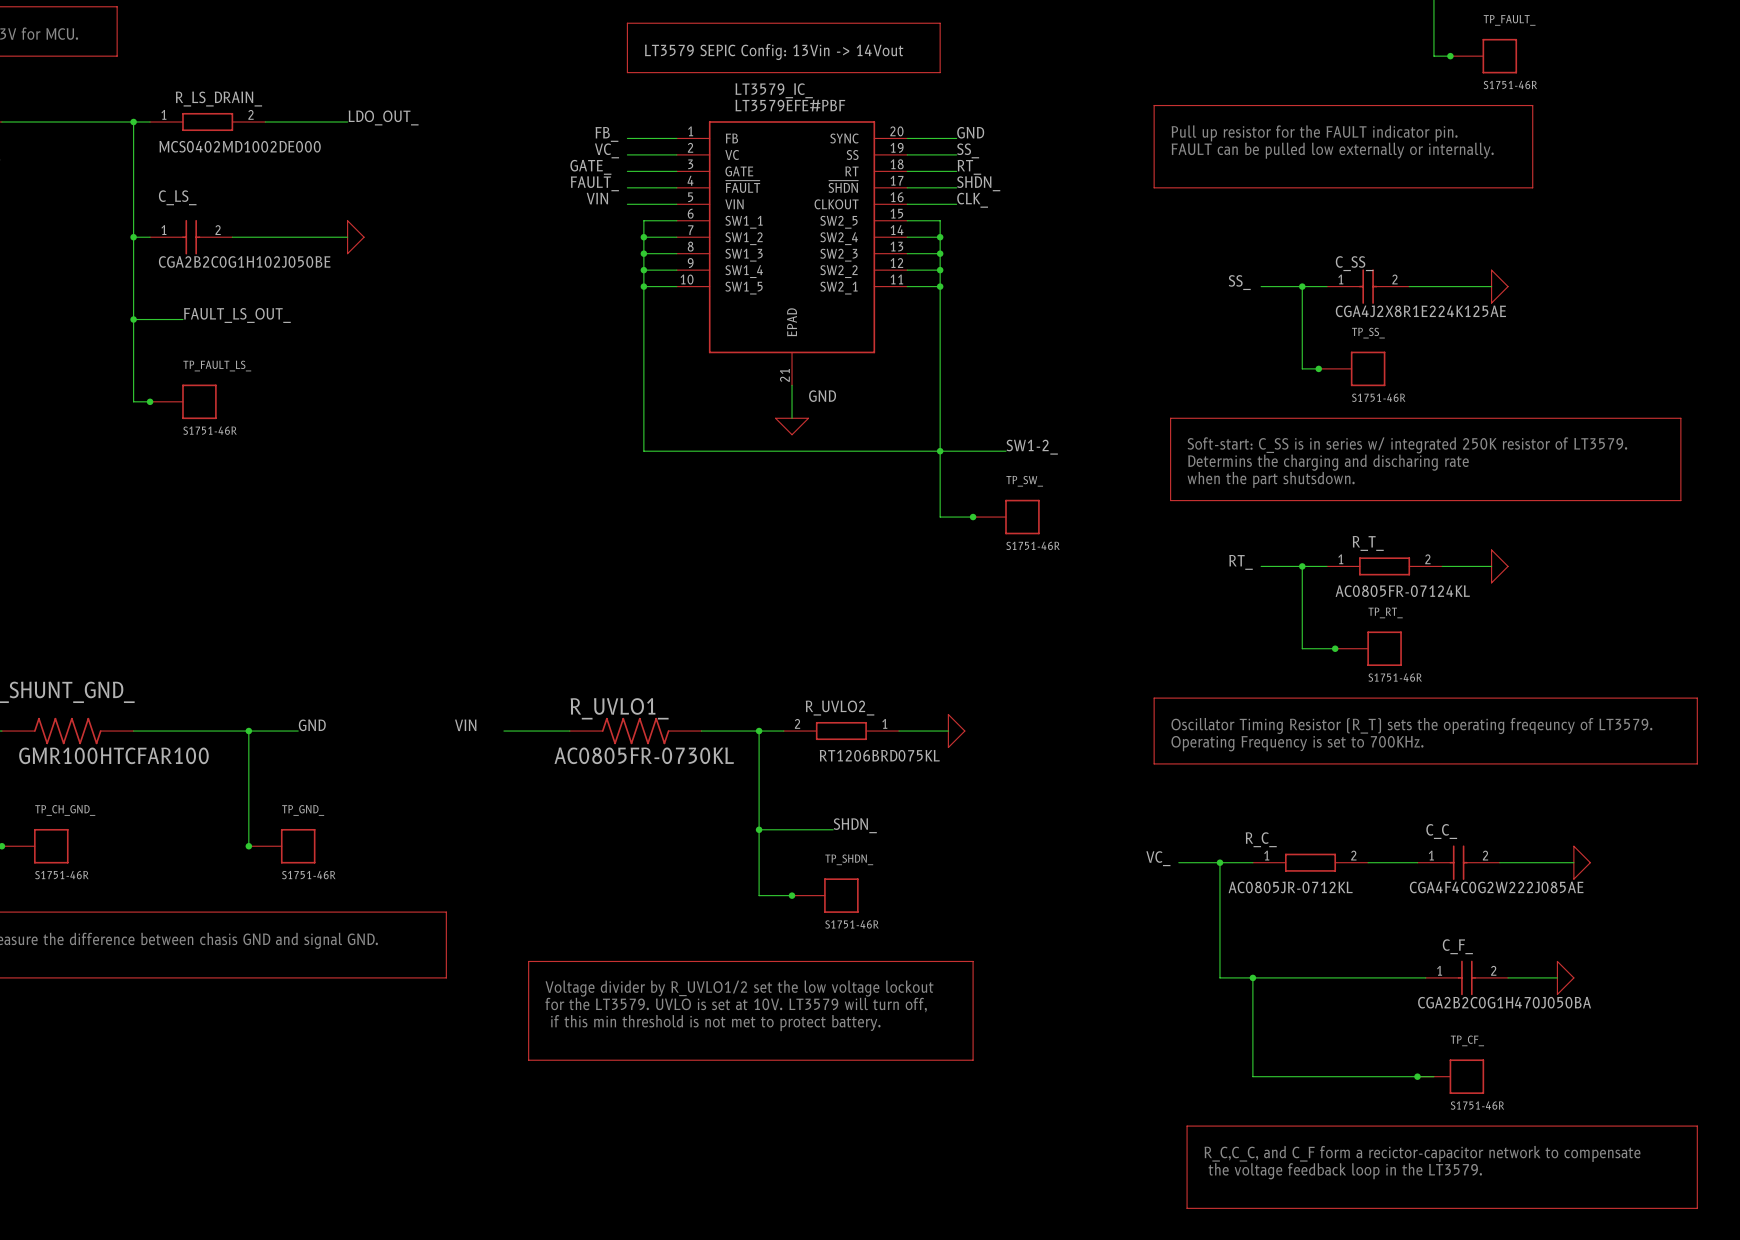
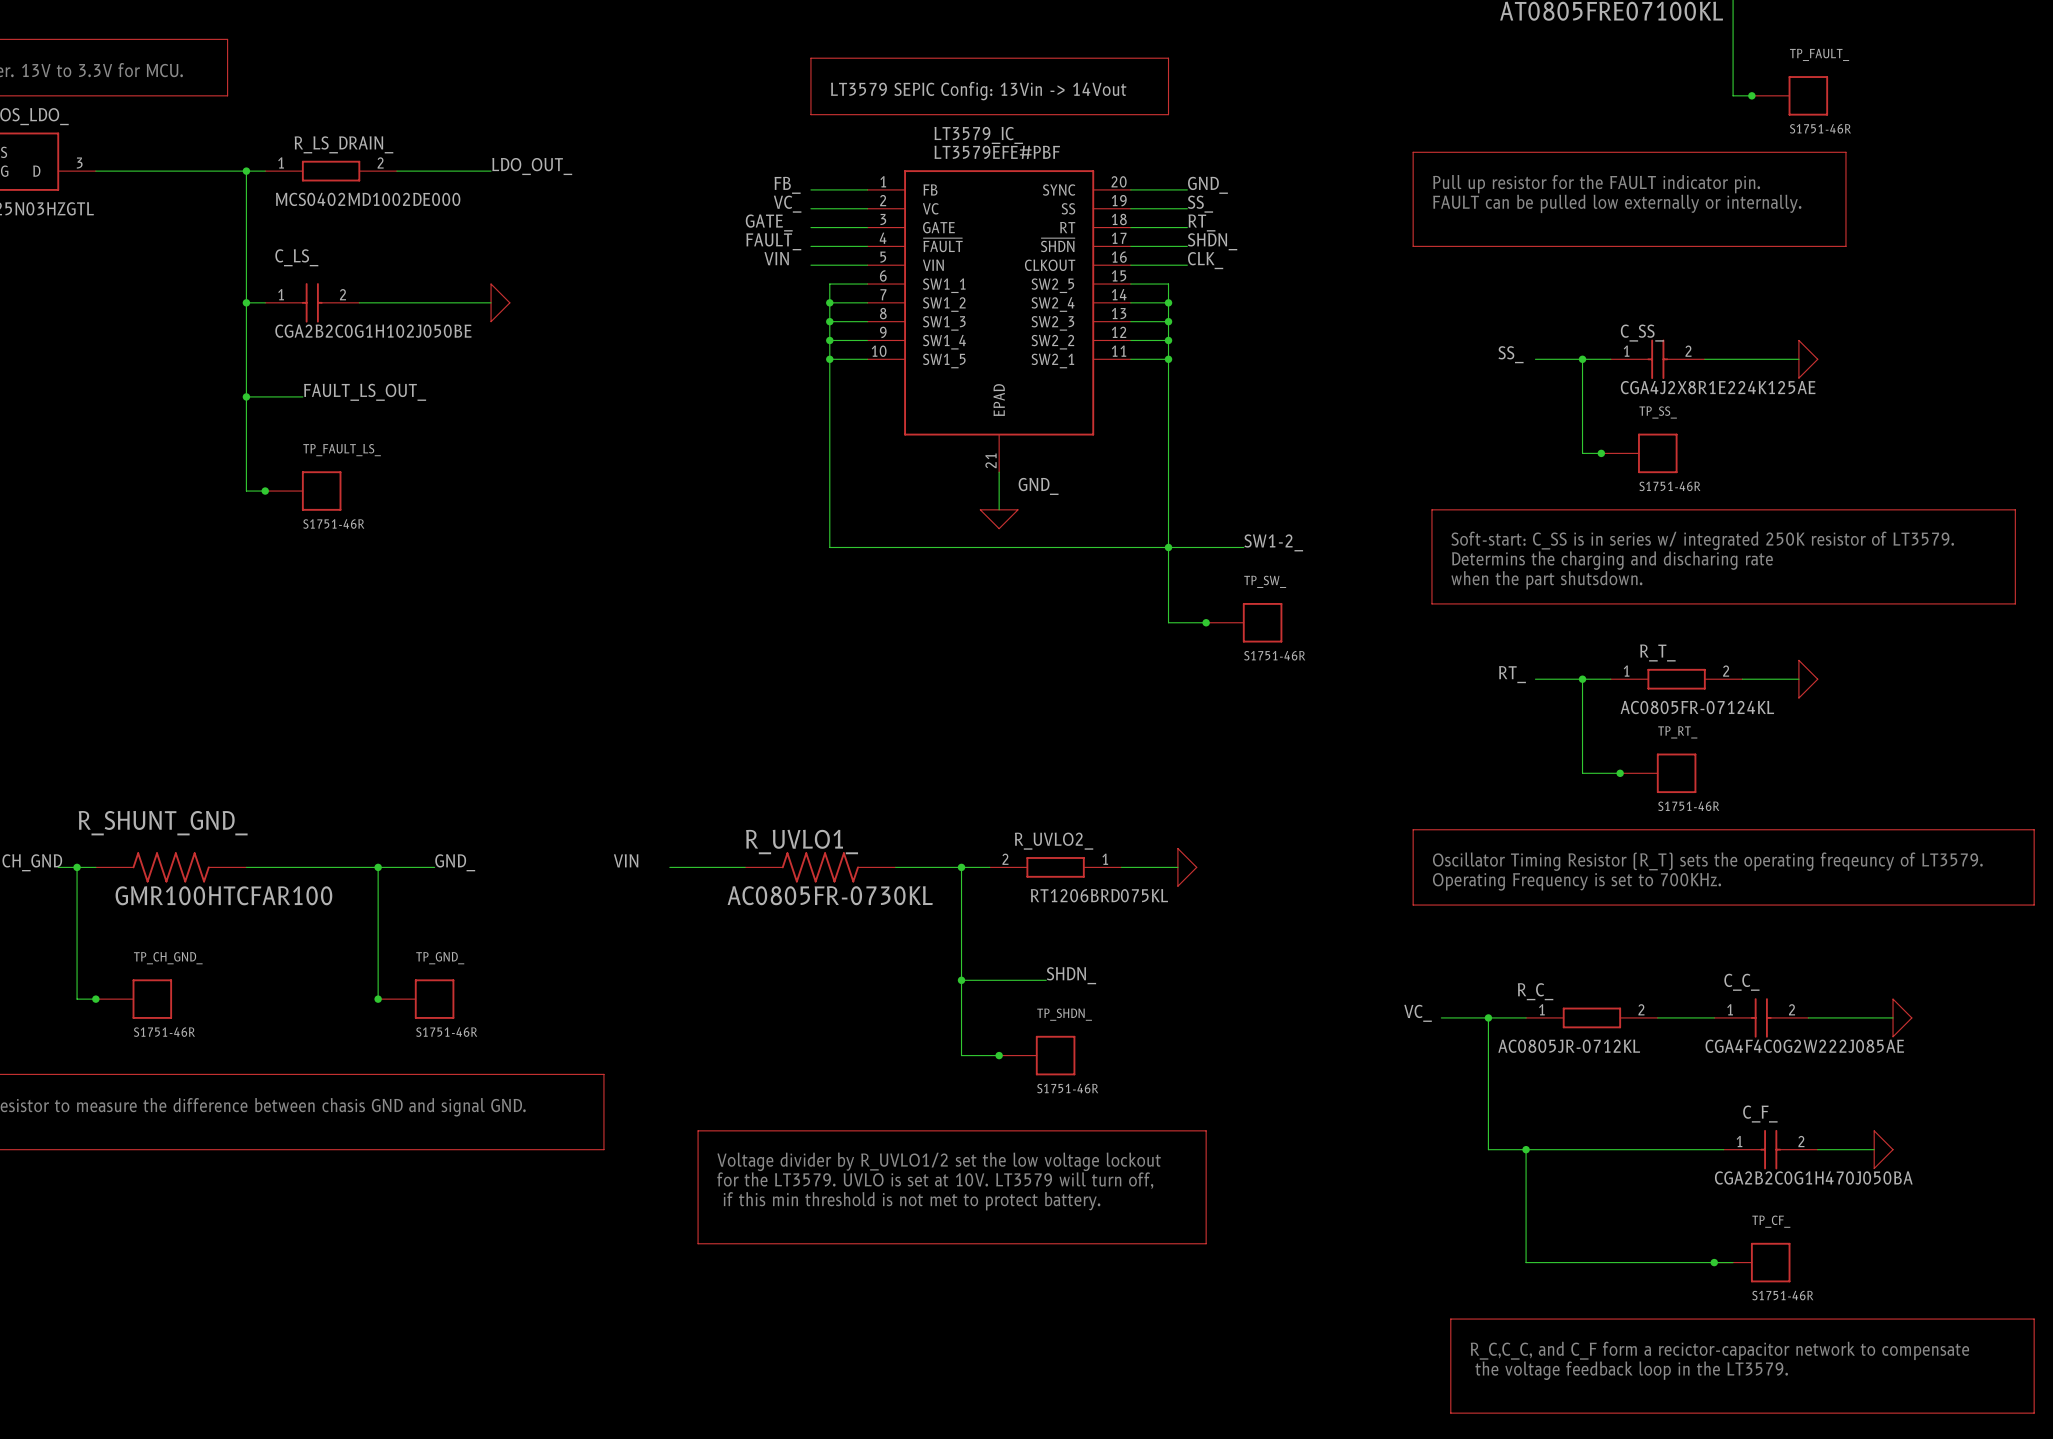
label: GND (970, 132) -> GND_ (1207, 185)
label: GND (822, 396) -> GND_ (1038, 486)
label: GND (312, 725) -> GND_ (455, 862)

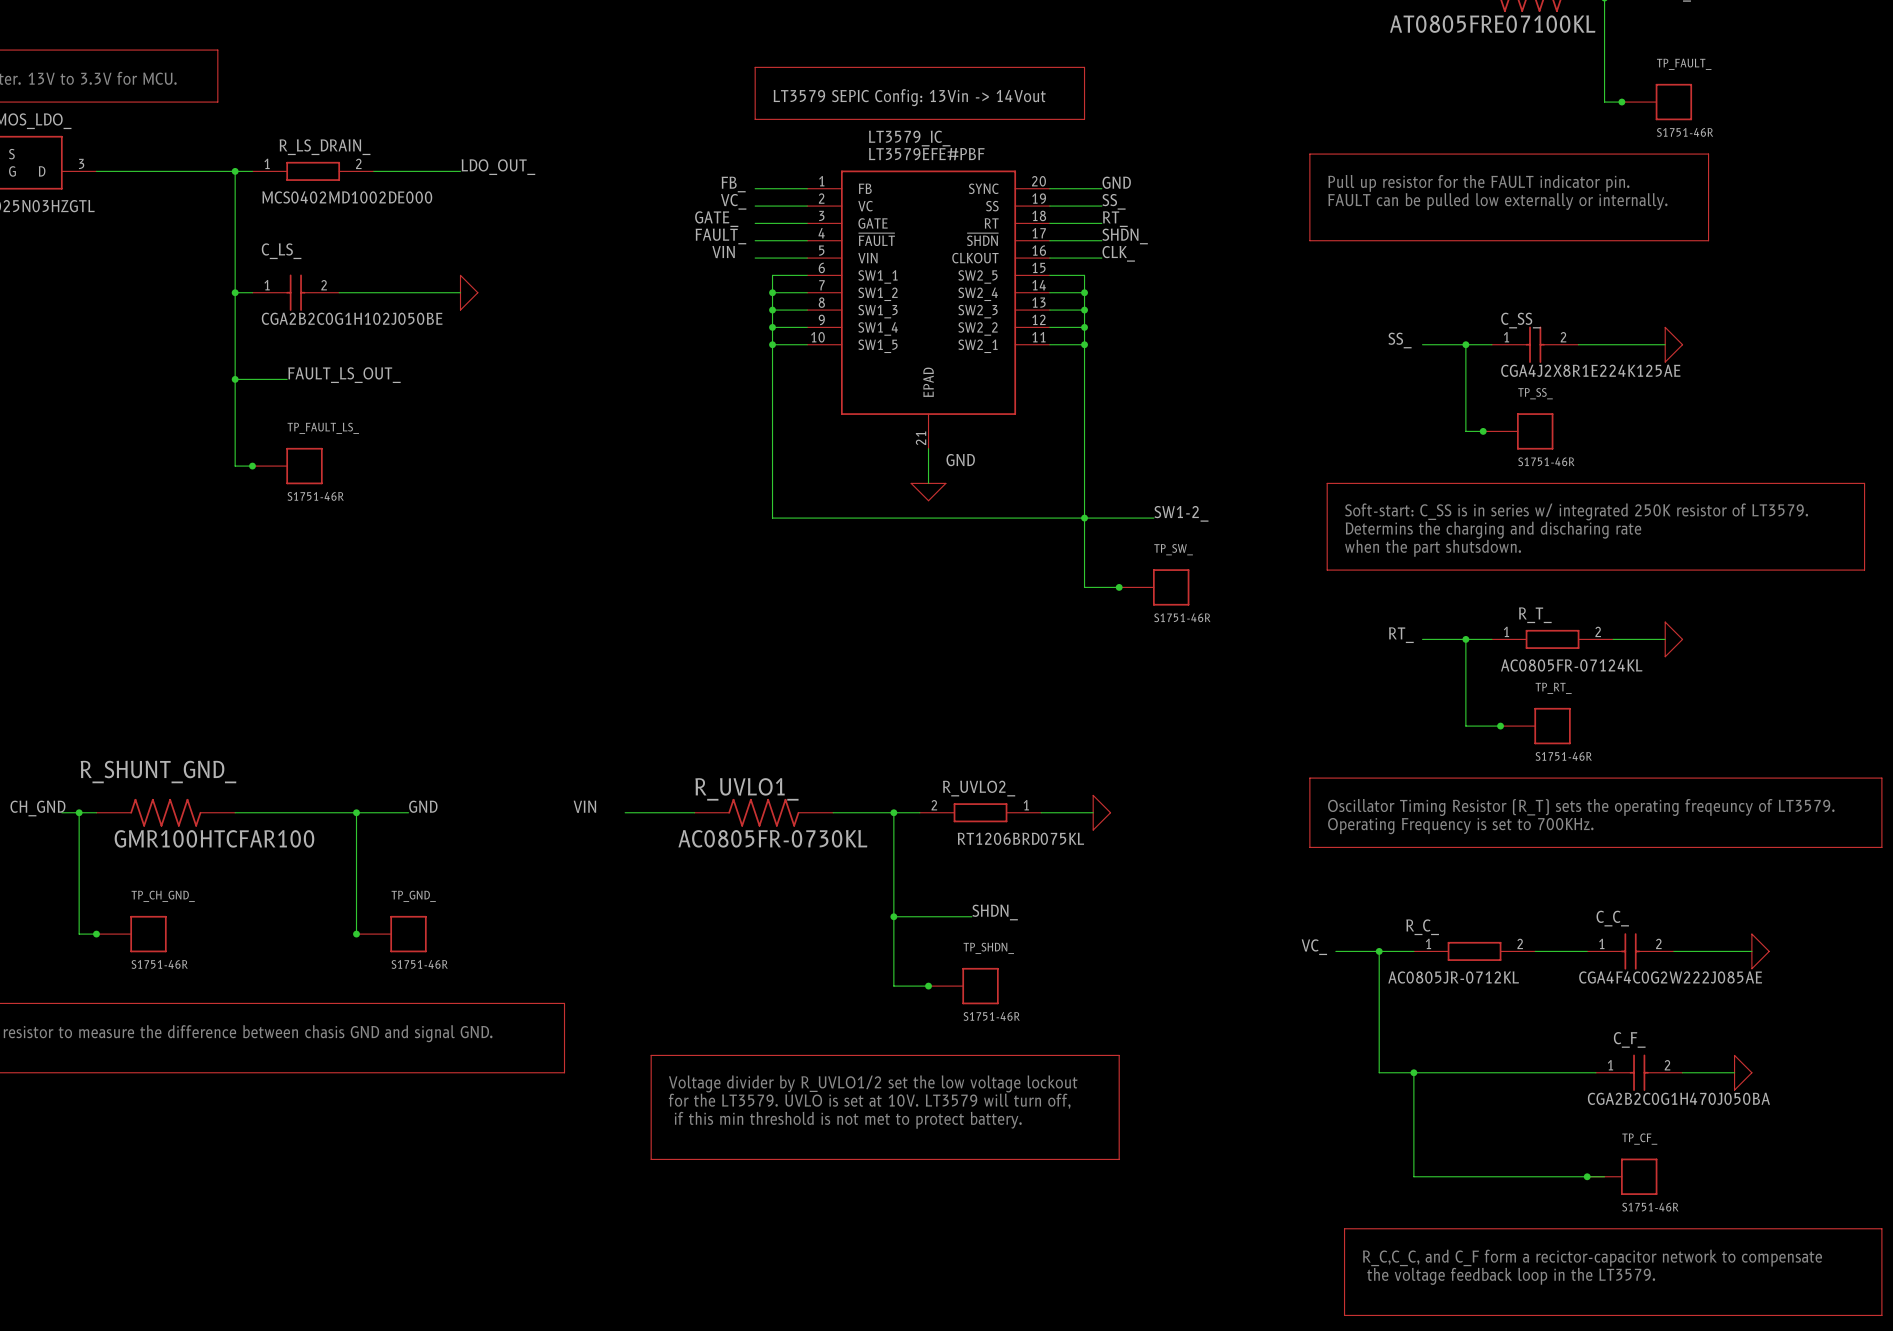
label: GND_ (1207, 185) -> GND (1116, 182)
label: GND_ (1038, 486) -> GND (960, 460)
label: GND_ (455, 862) -> GND (423, 806)

